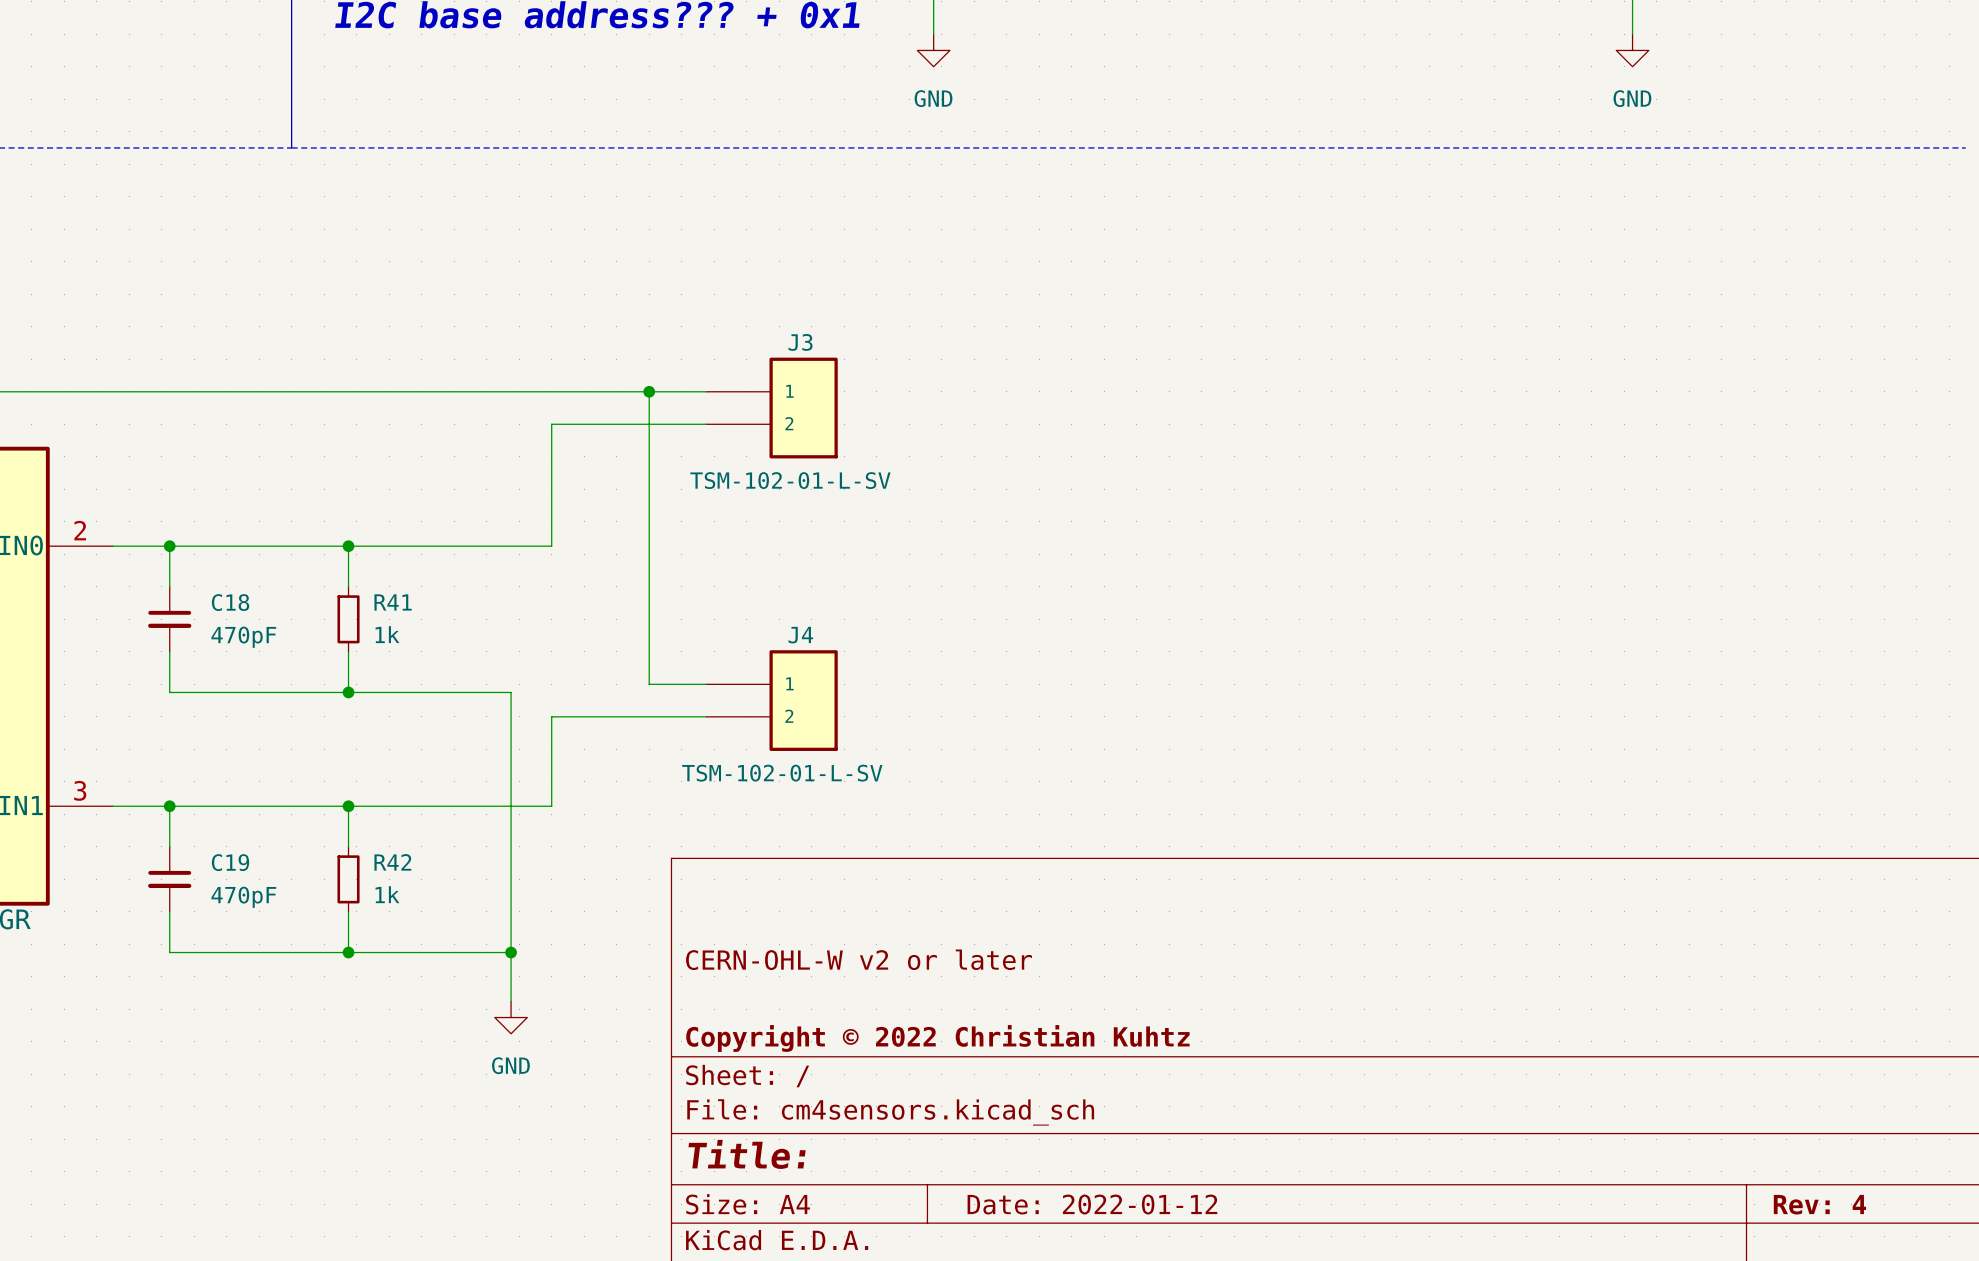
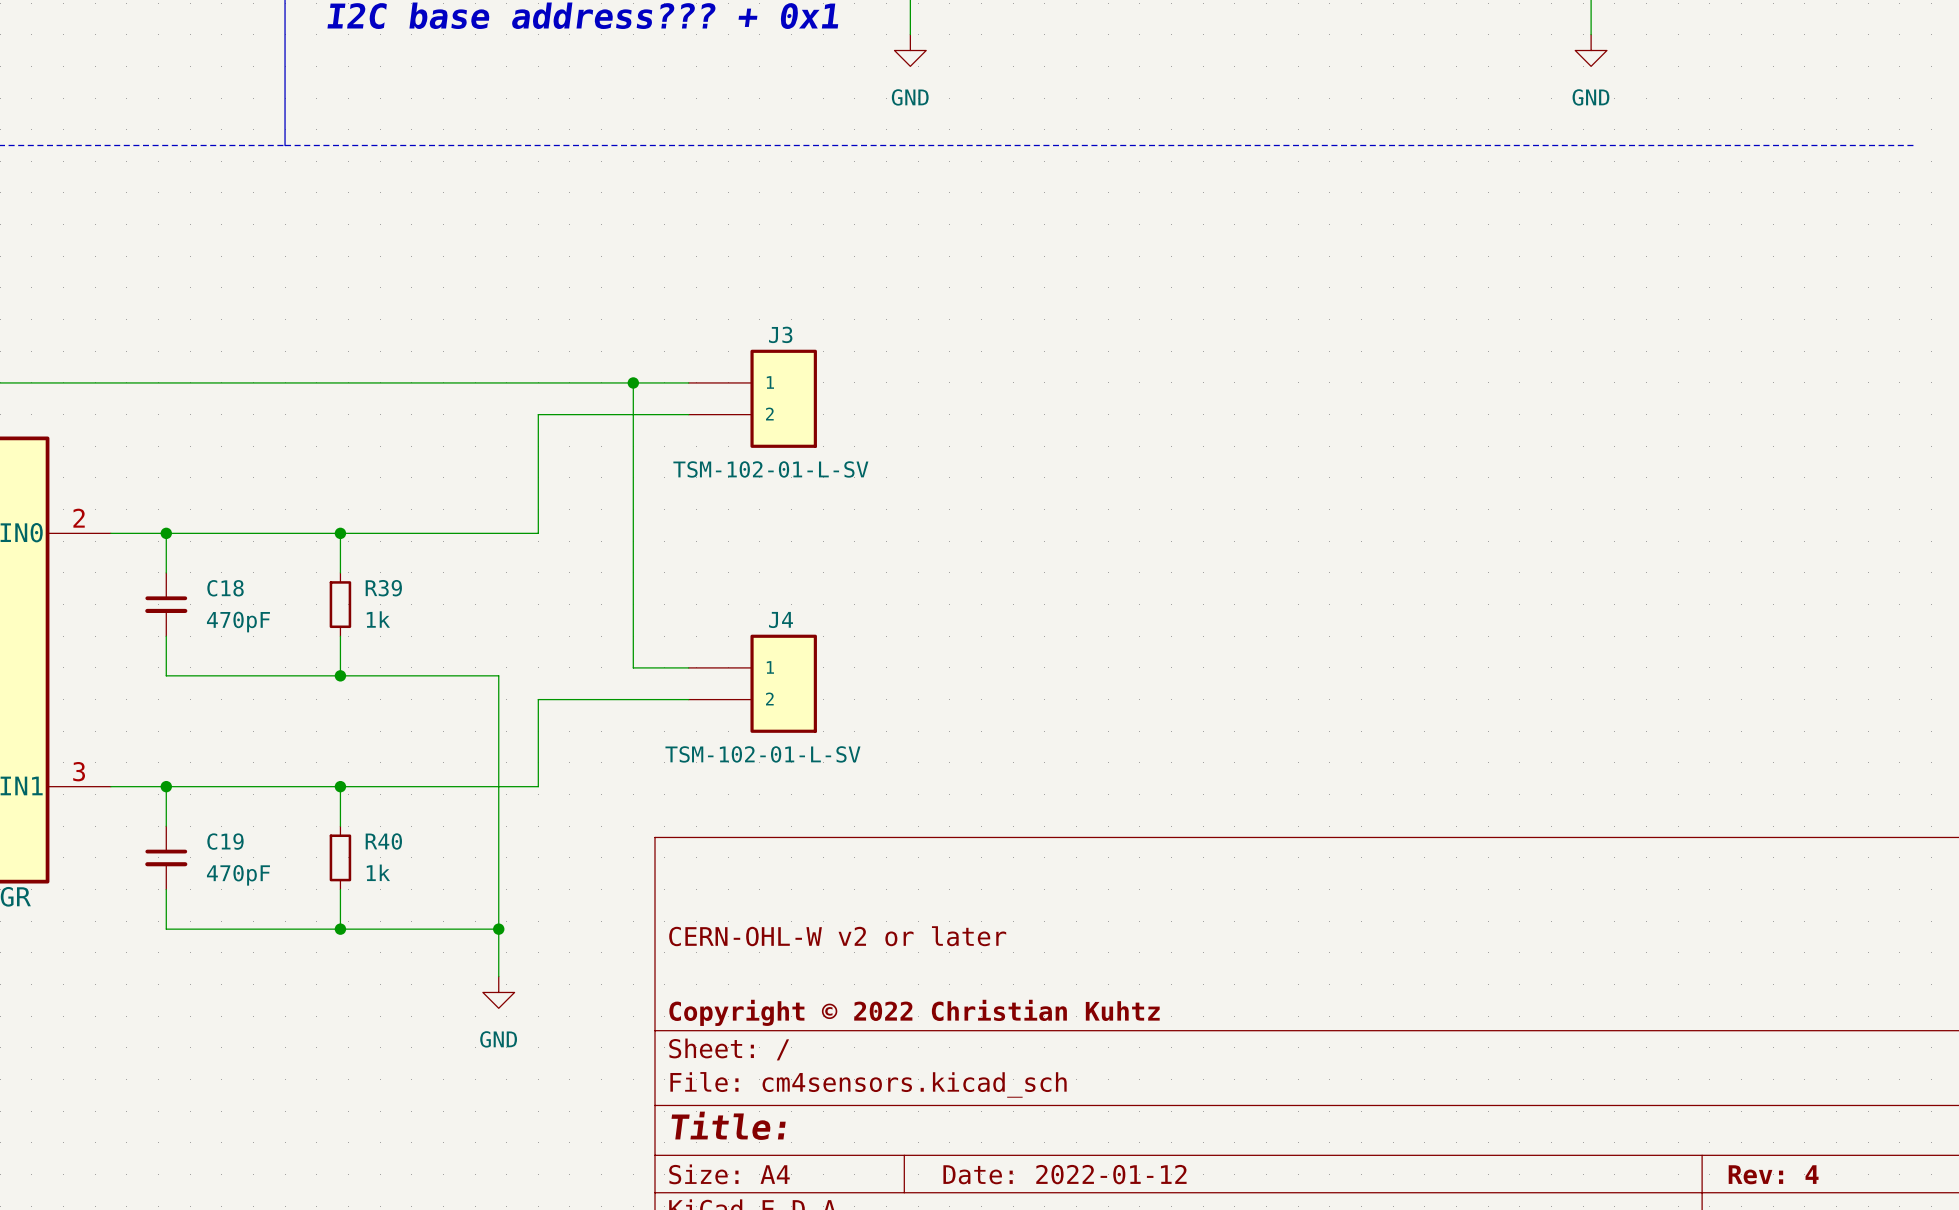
R41 name: R41 (393, 602) -> R39 (383, 588)
R42 name: R42 (392, 862) -> R40 (383, 841)

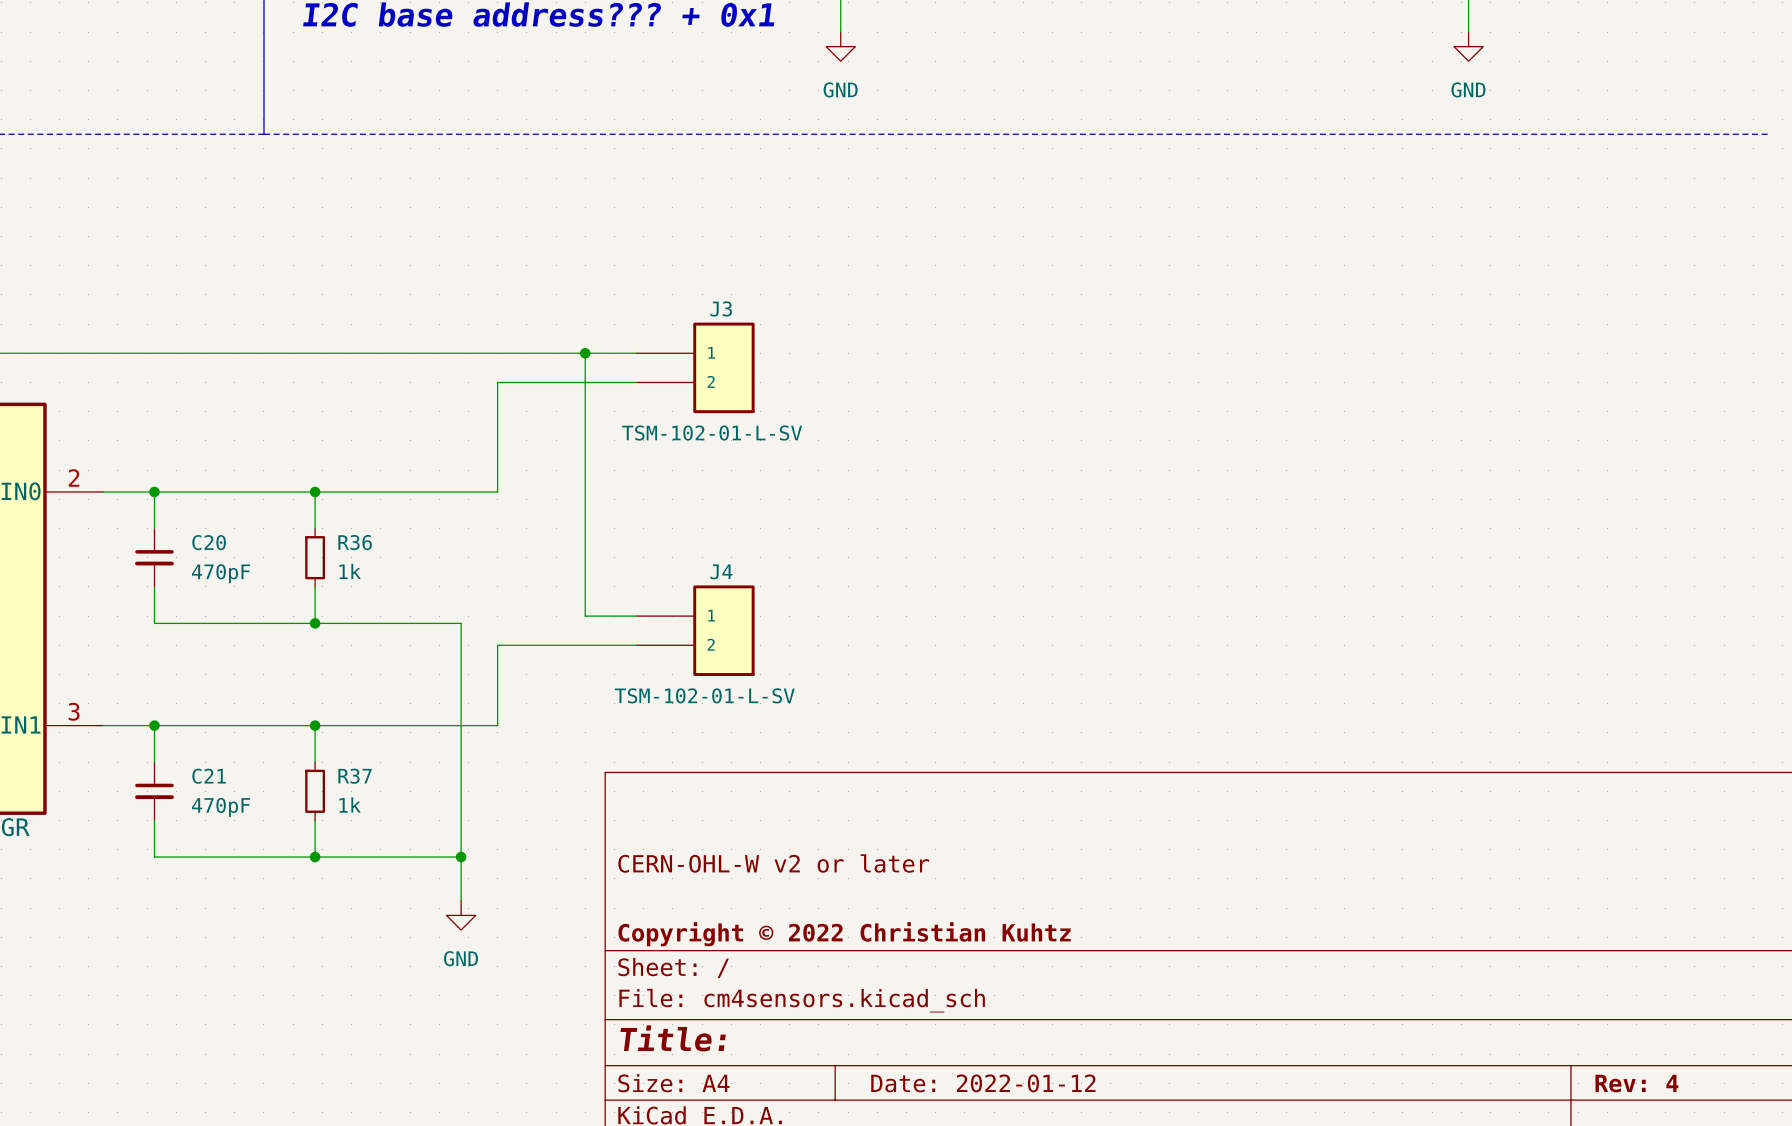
C18 name: C18 (225, 588) -> C20 (209, 542)
R39 name: R39 (383, 588) -> R36 (355, 542)
C19 name: C19 (225, 841) -> C21 (209, 776)
R40 name: R40 (383, 841) -> R37 (355, 776)

